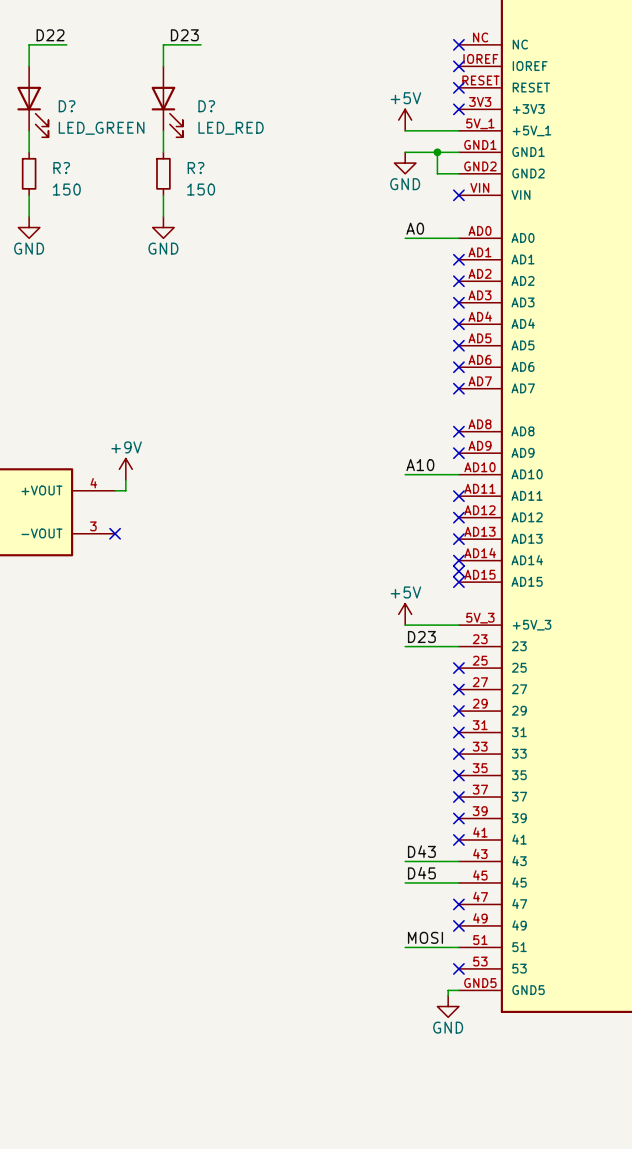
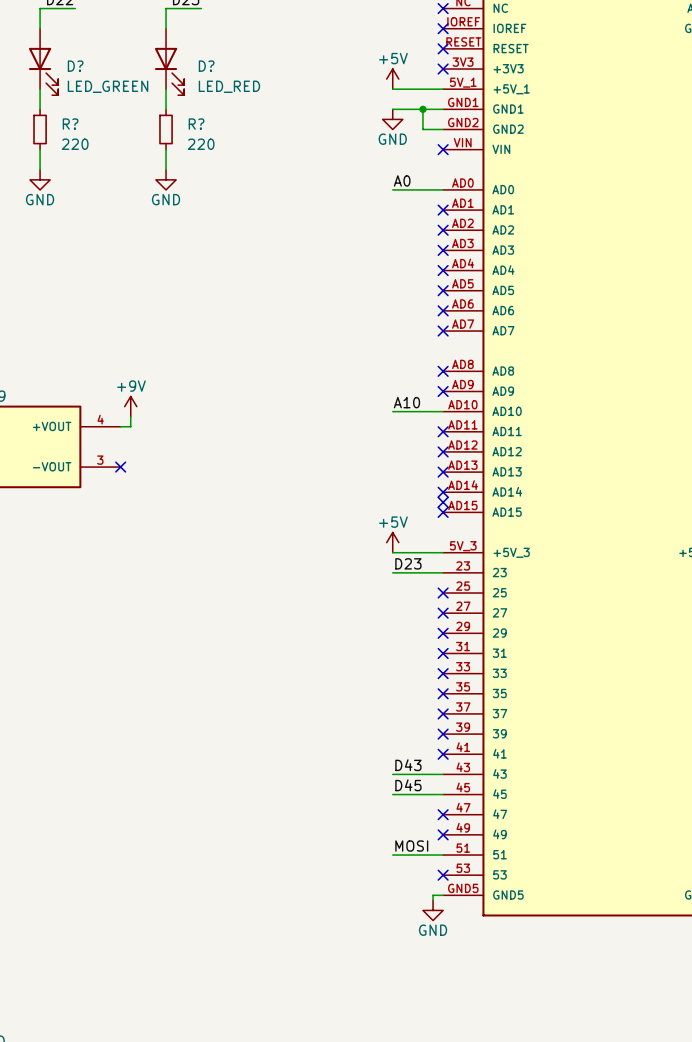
R? value: 150 (66, 189) -> 220 (75, 144)
R? value: 150 (201, 189) -> 220 (201, 144)

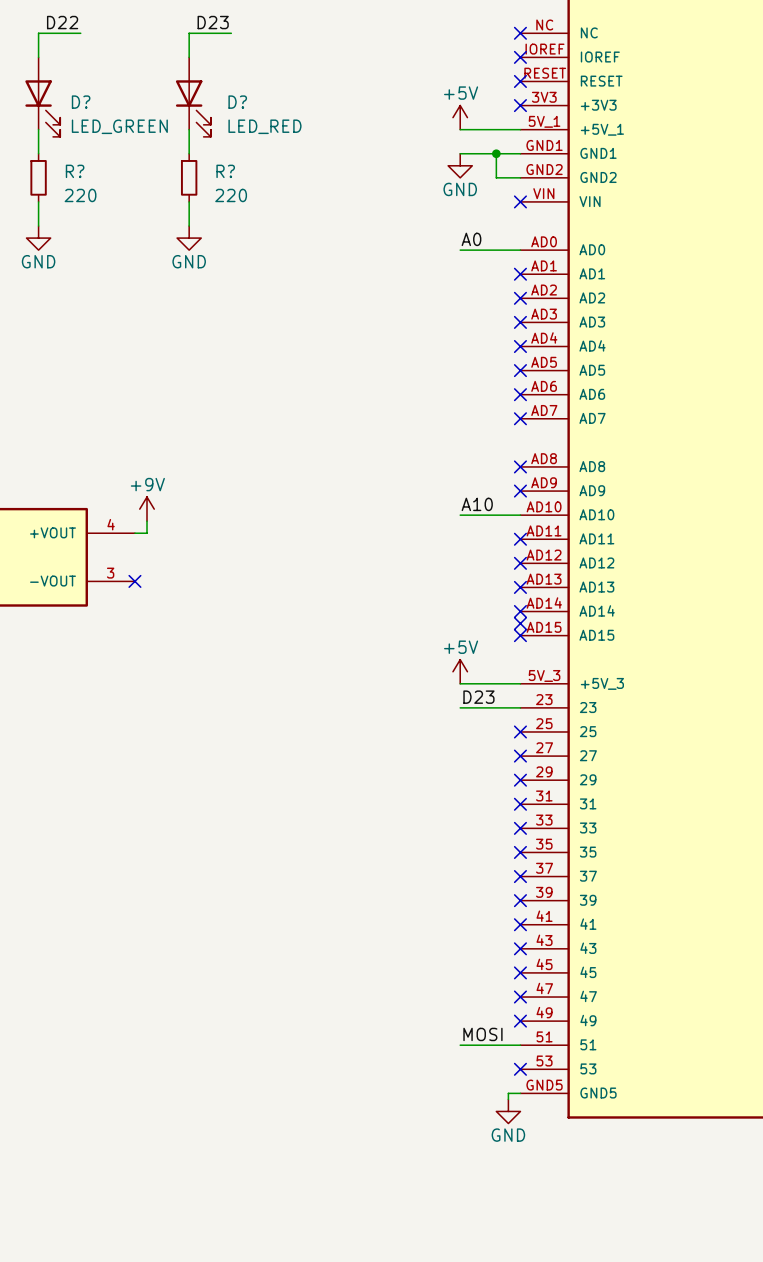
label: D43 (408, 765) -> none
wire: (392, 774) (443, 774) -> none
no-connect mark: none -> (520, 948)
label: D45 (408, 785) -> none
wire: (392, 794) (443, 794) -> none
no-connect mark: none -> (520, 972)

